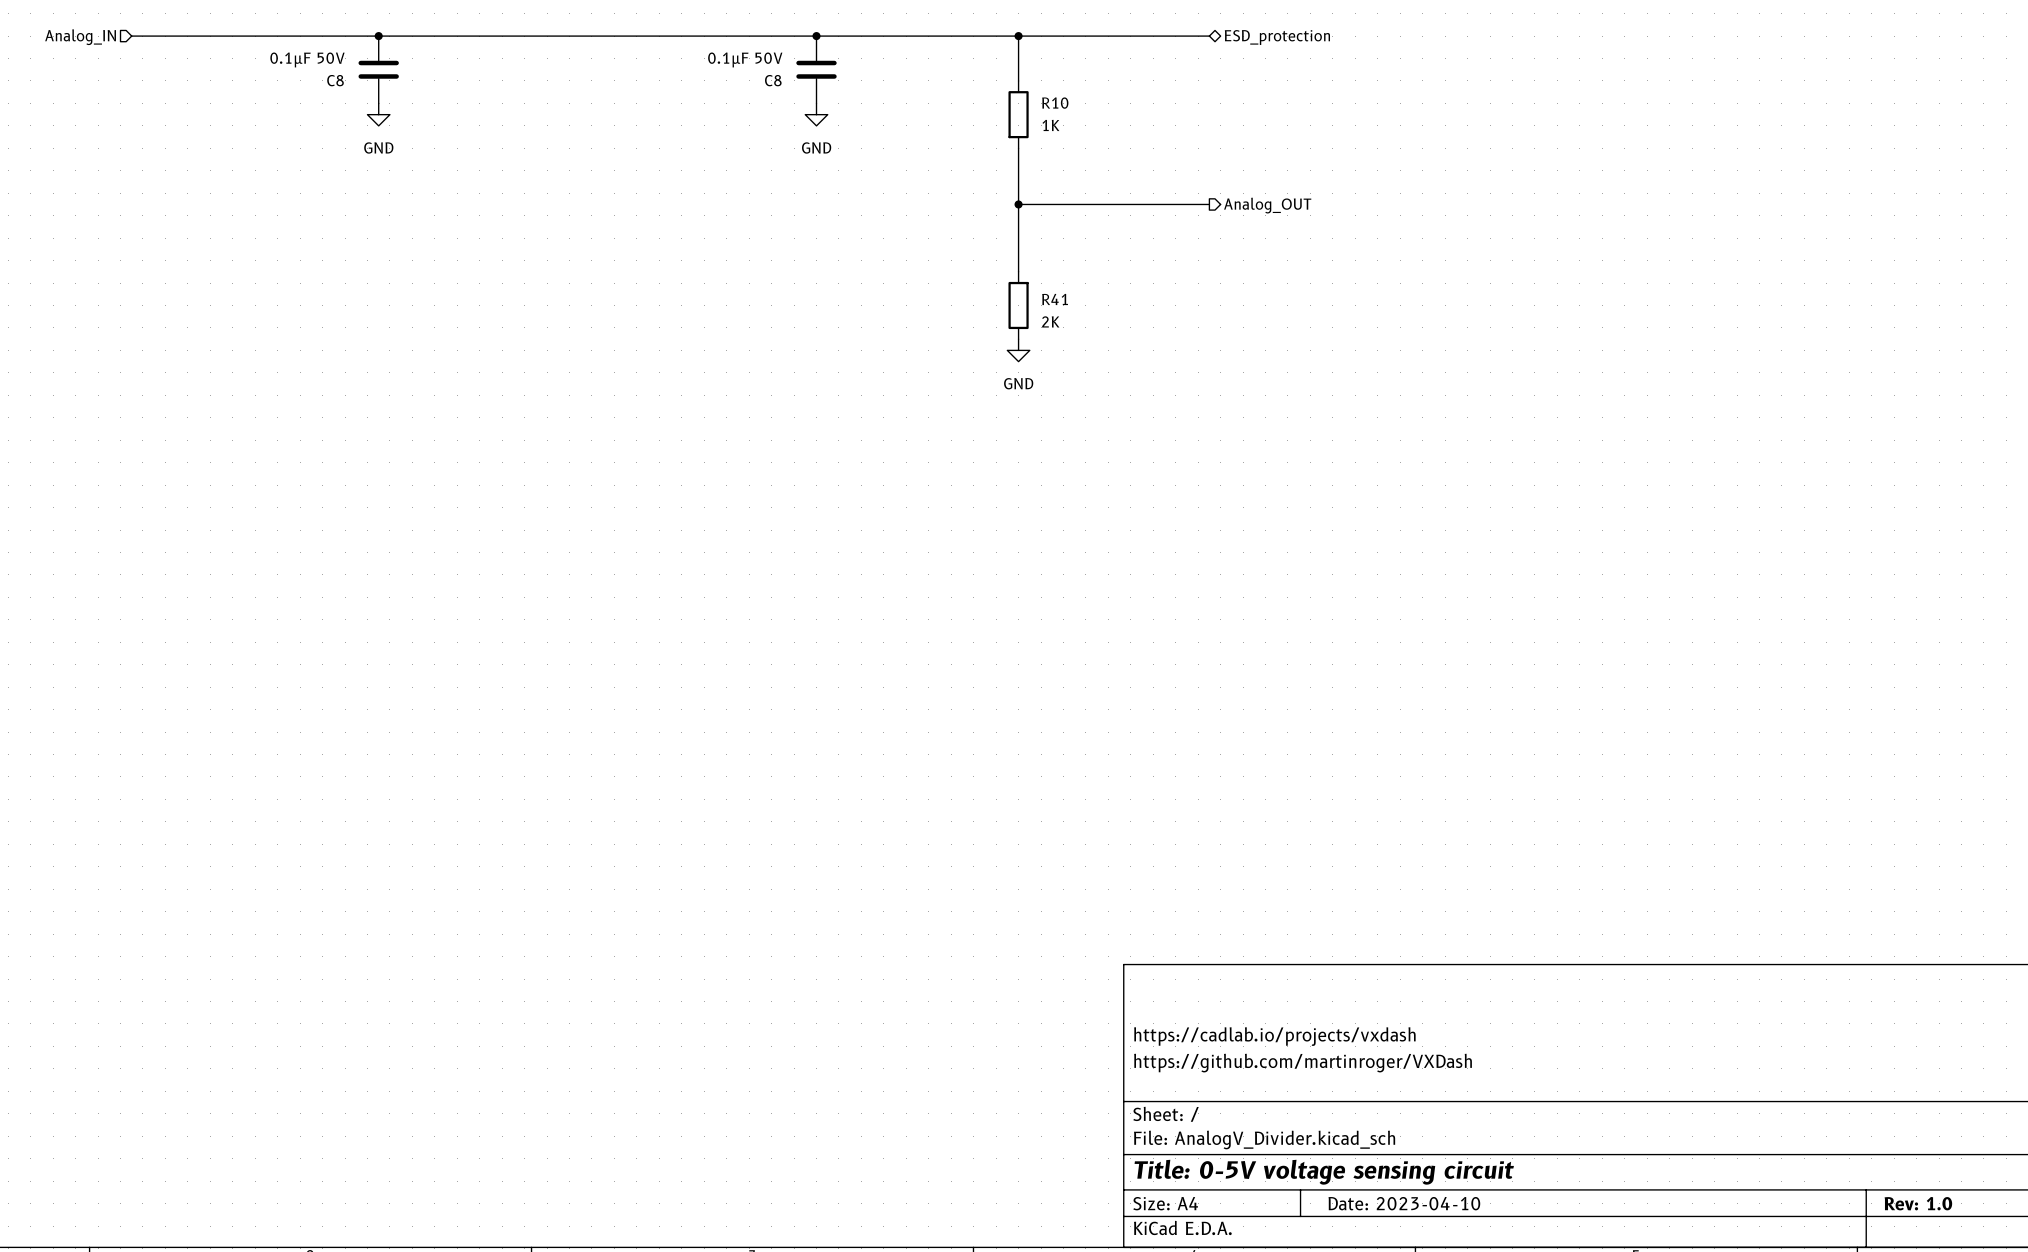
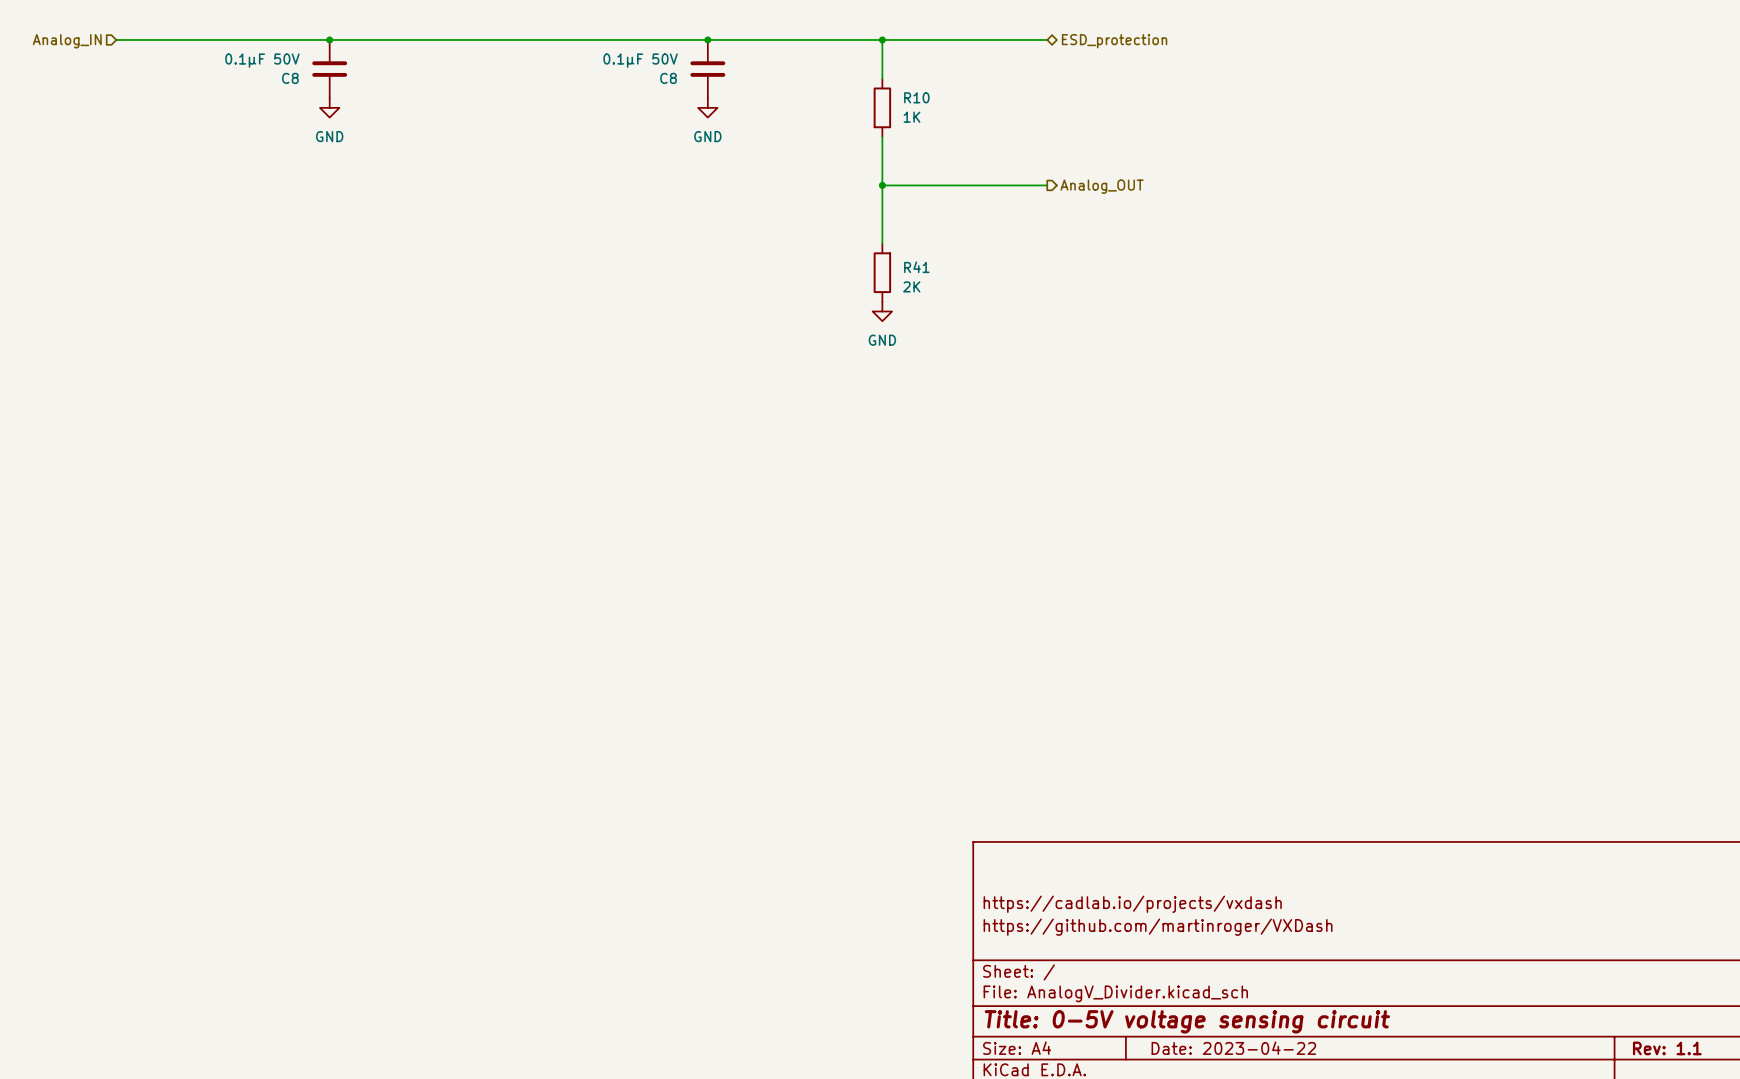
title block: Date: 2023-04-10 (1404, 1203) -> Date: 2023-04-22 (1233, 1048)
title block: Rev: 1.0 (1918, 1203) -> Rev: 1.1 (1667, 1048)

